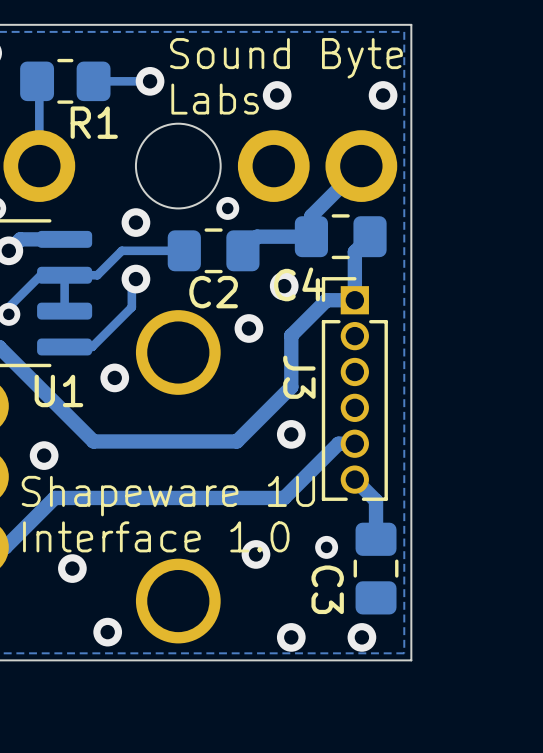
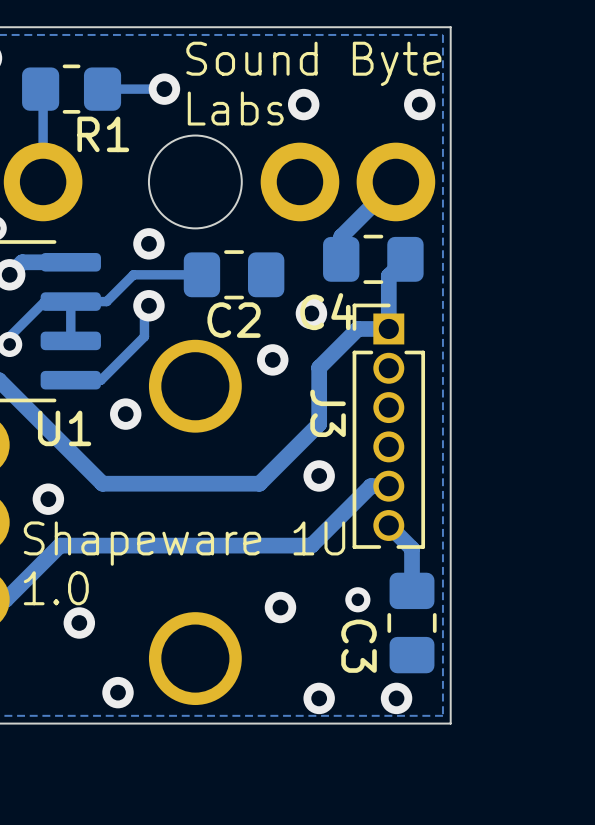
via: (227, 208) -> none
track: (311, 236) (257, 236) (242, 250) -> none
text: Interface 1.0 (156, 536) -> 1.0 (56, 588)

